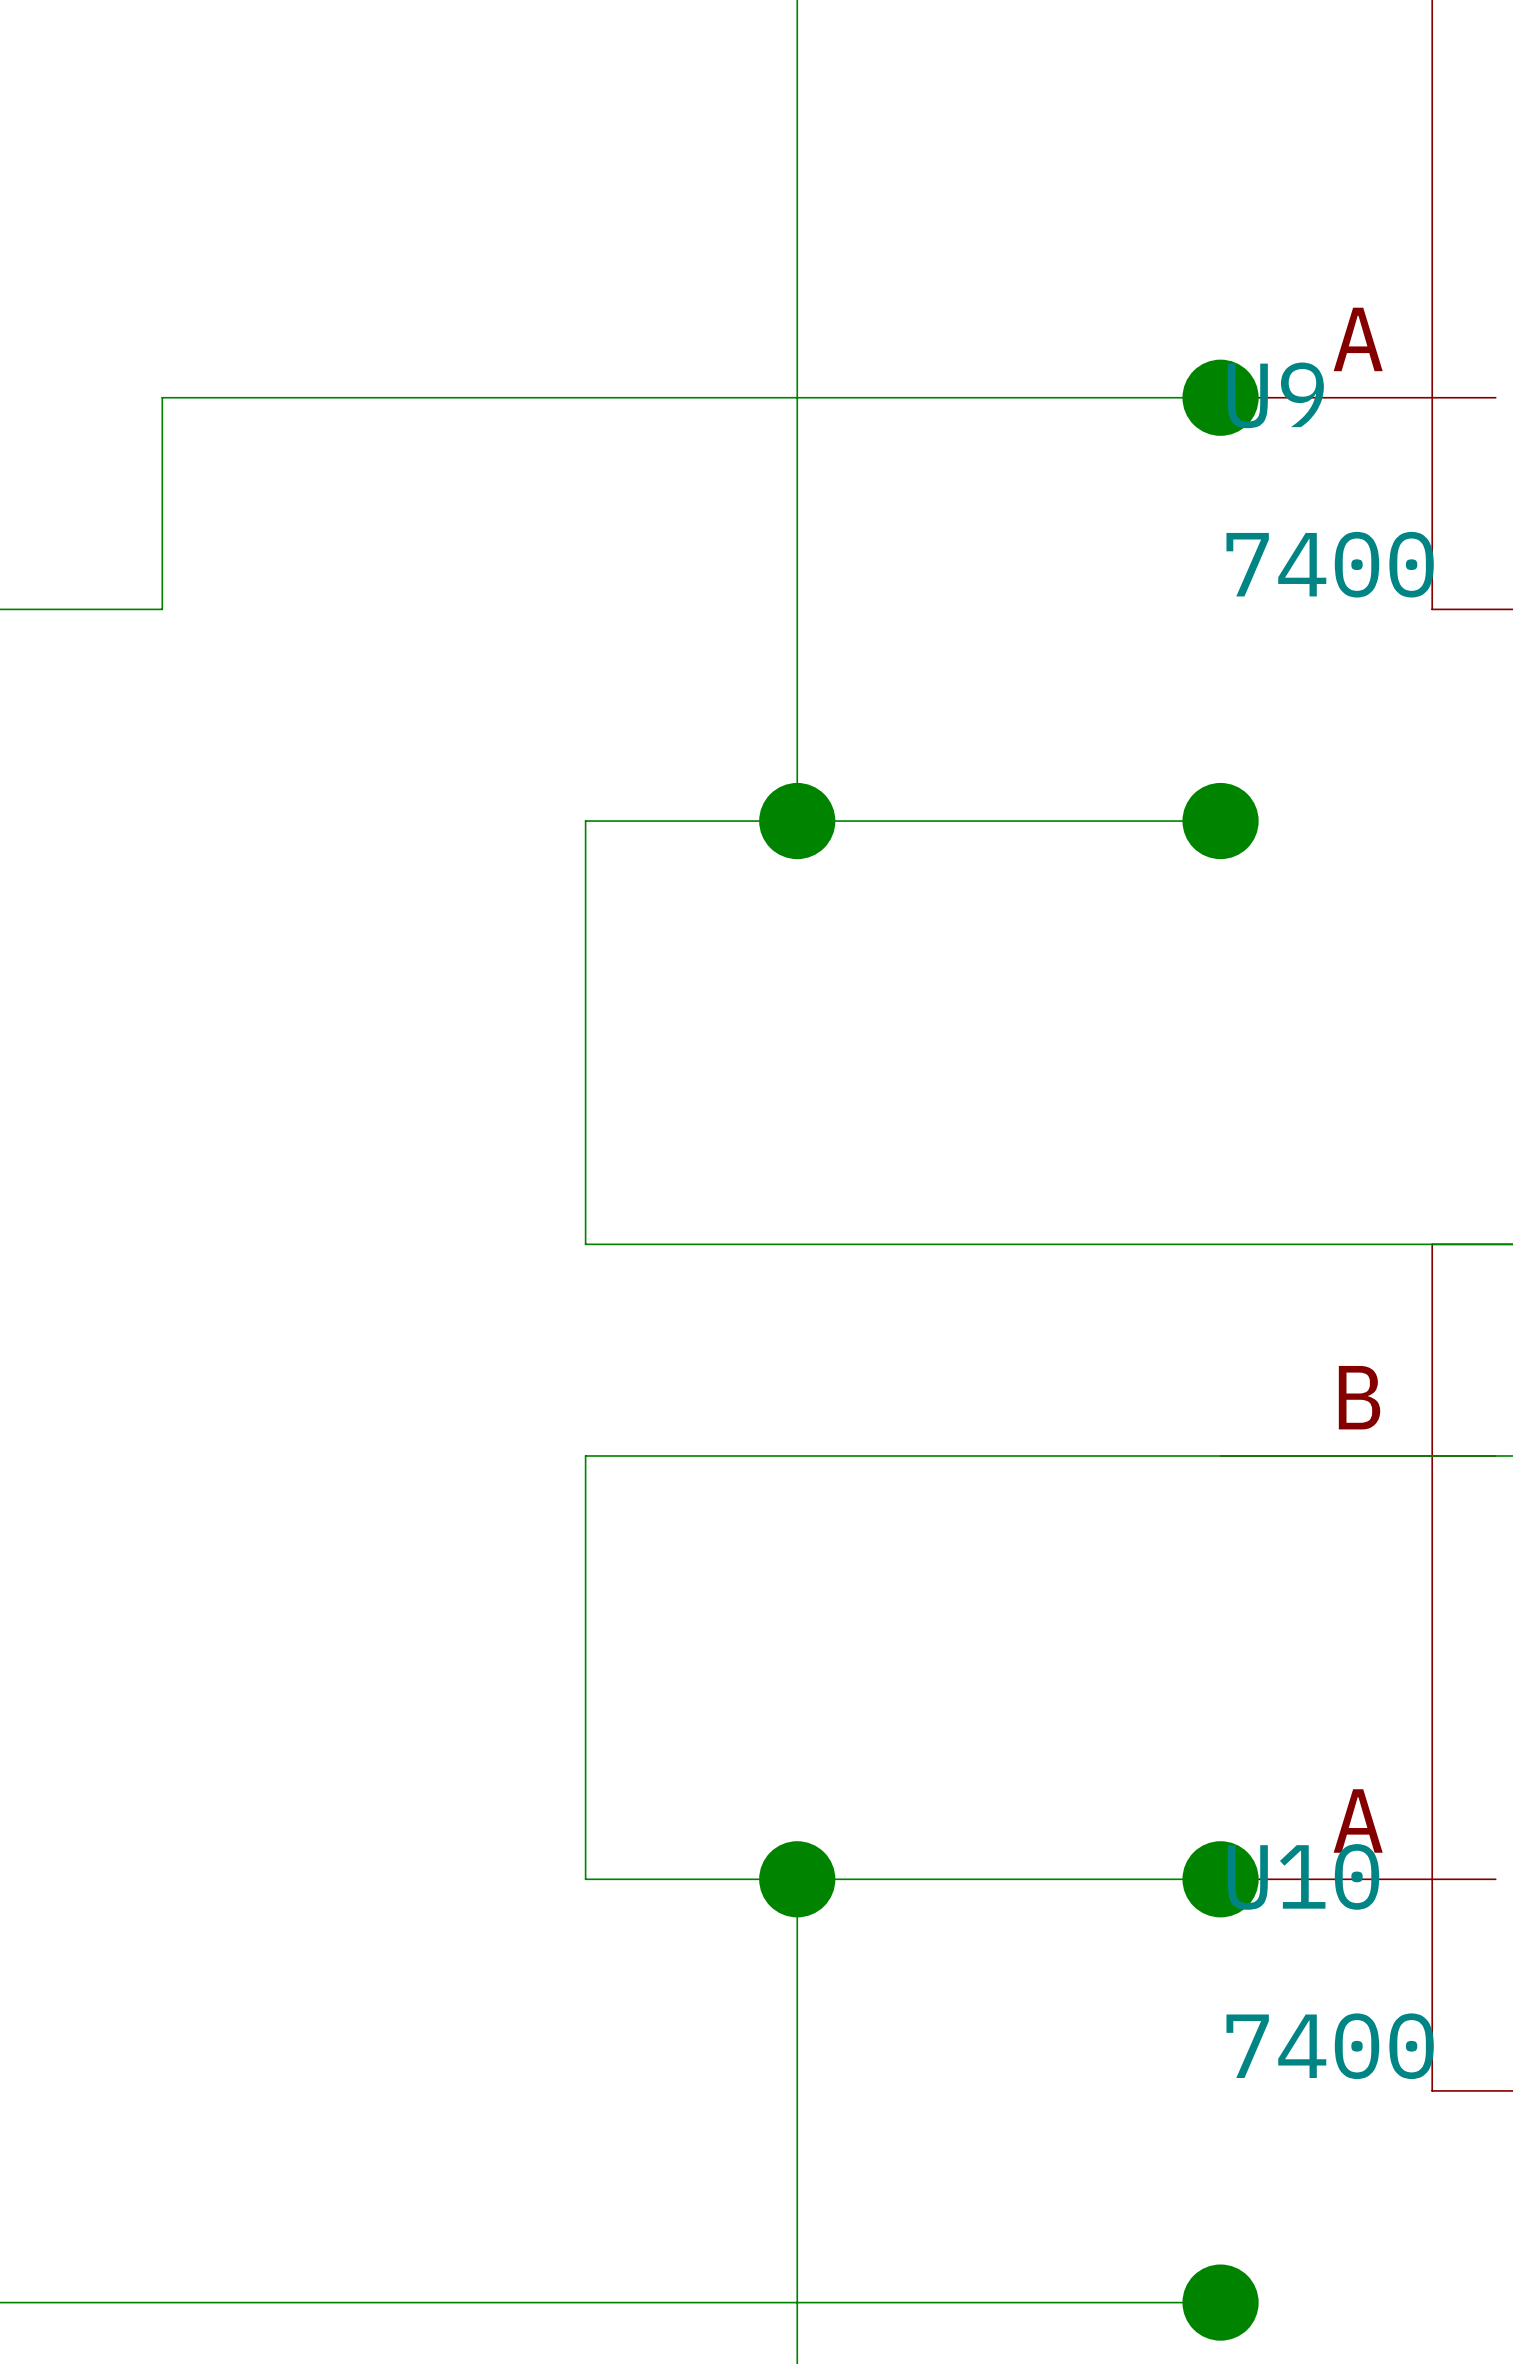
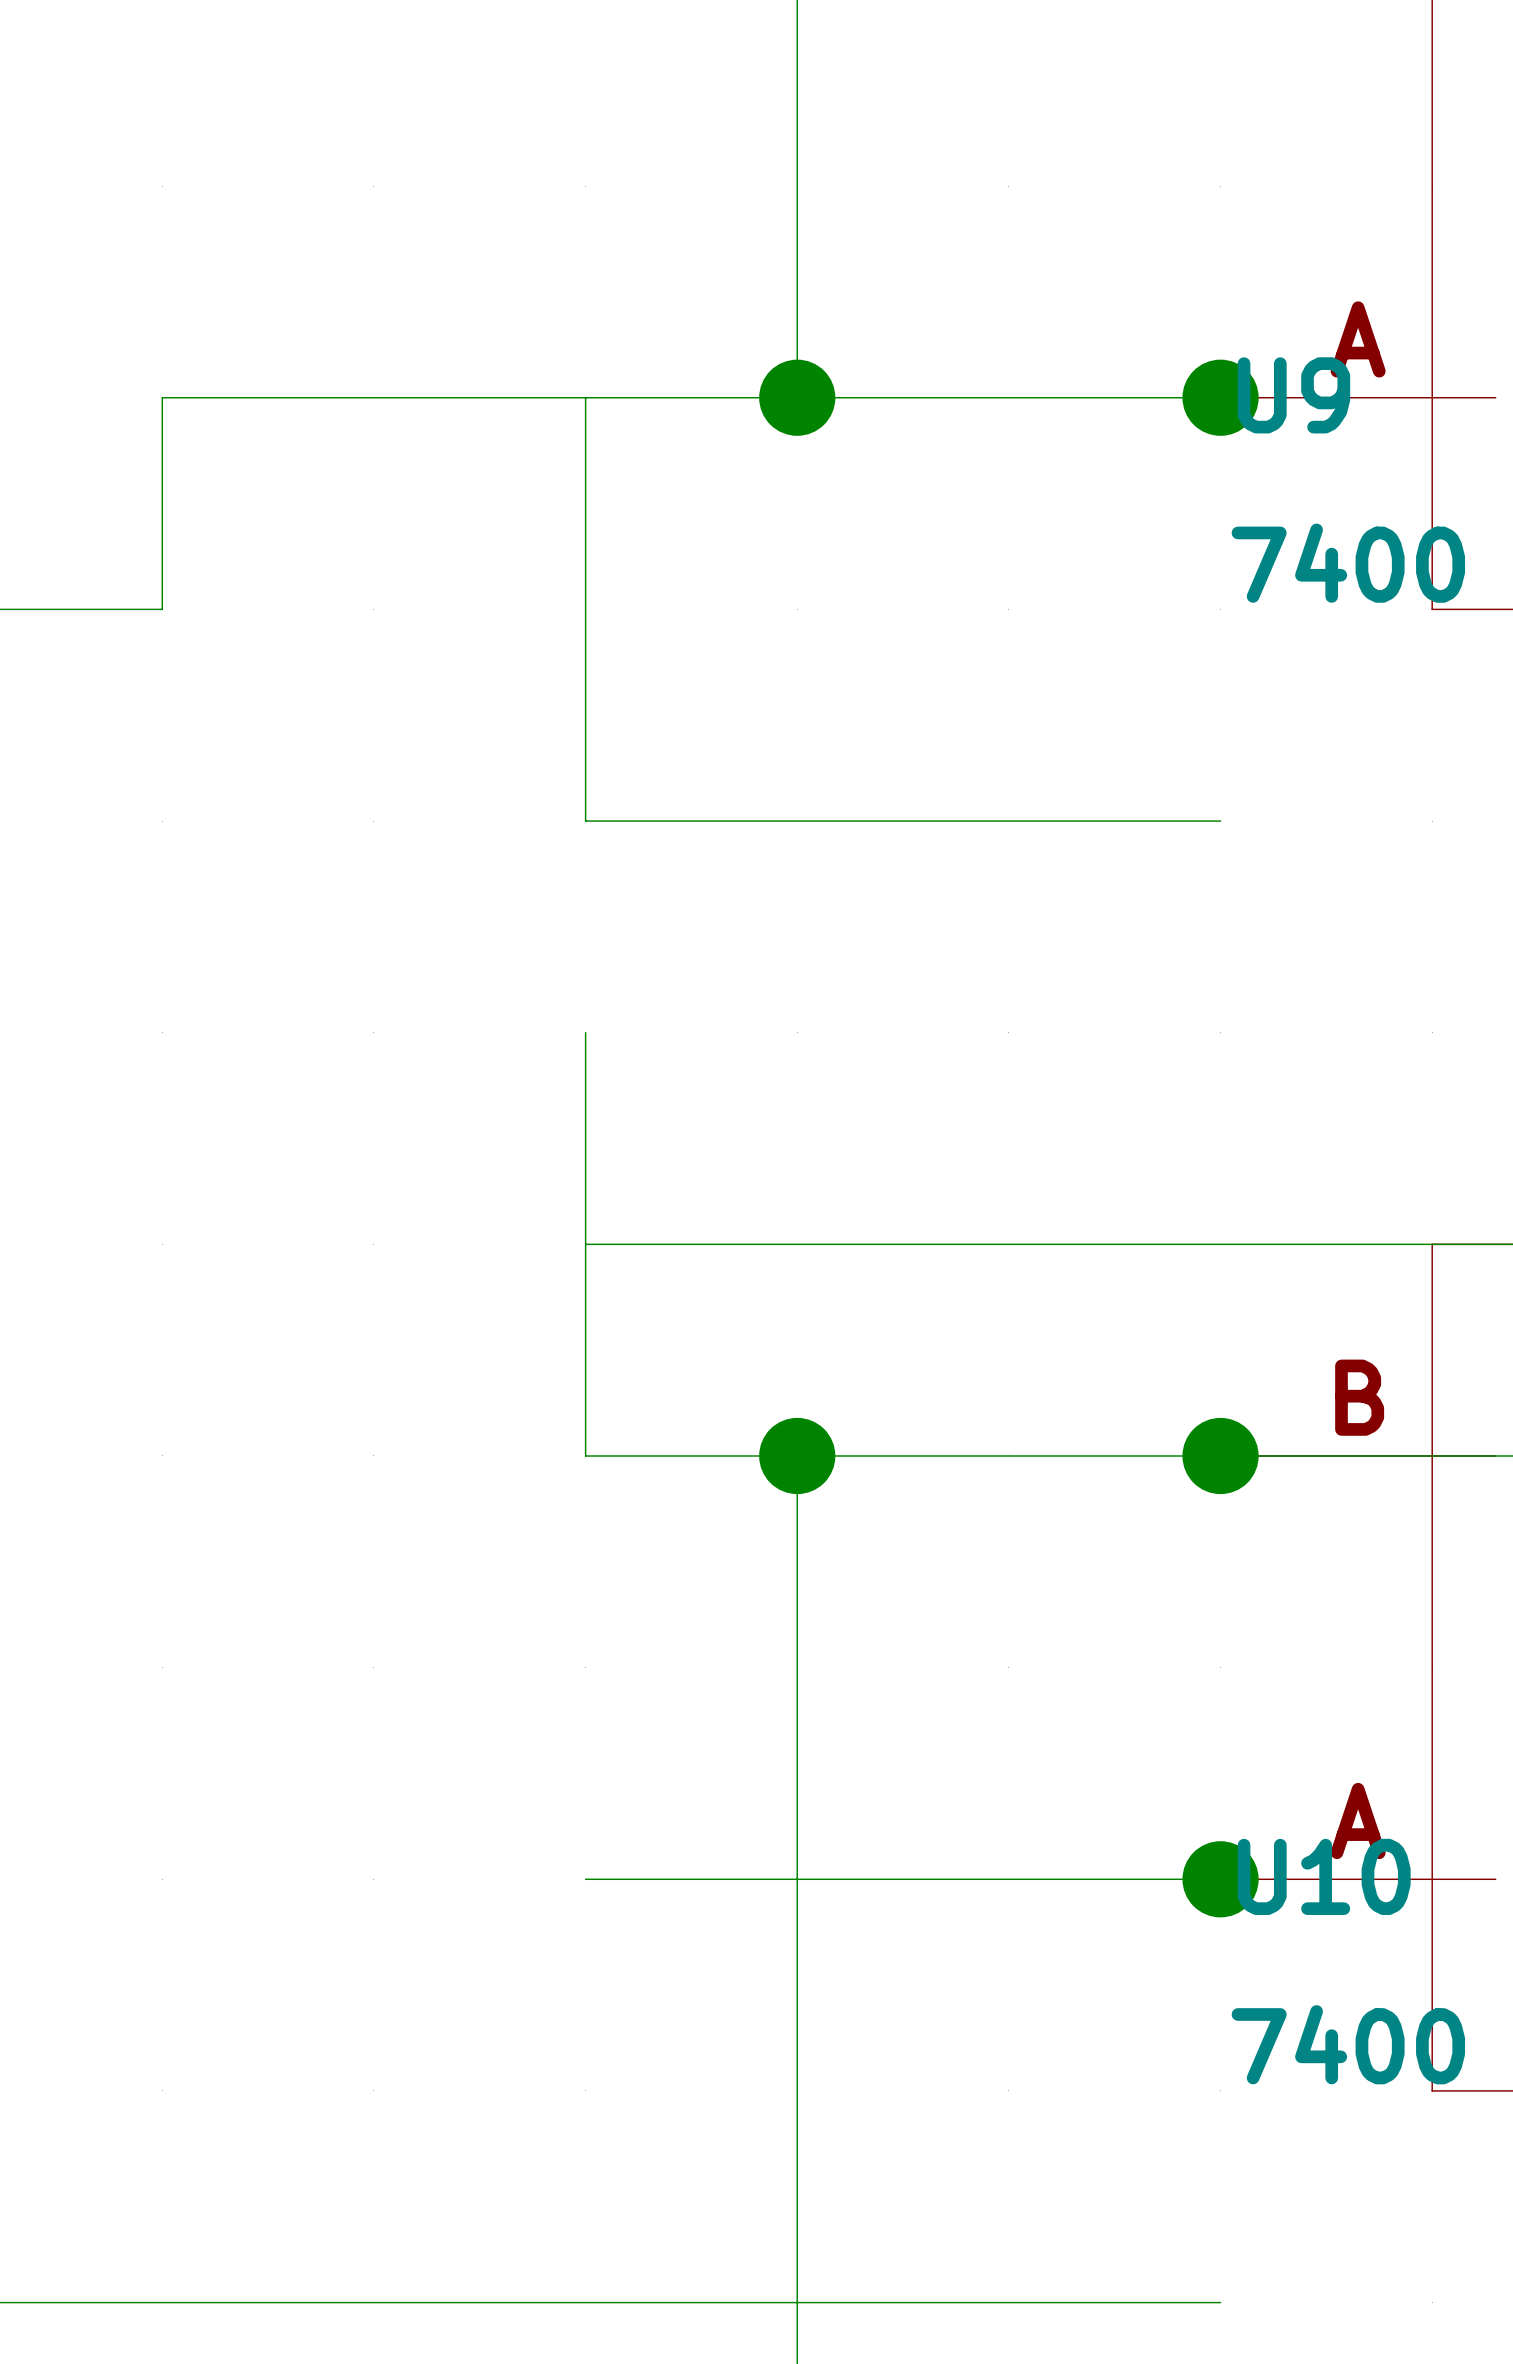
wire: (797, 397) (797, 821) -> (797, 1455) (797, 1879)
junction: none -> (797, 397)
wire: (585, 821) (585, 1032) -> (585, 821) (585, 397)
junction: (797, 821) -> none
junction: (1220, 821) -> none
wire: (585, 1455) (585, 1879) -> (585, 1455) (585, 1244)
junction: none -> (797, 1455)
junction: none -> (1220, 1455)
junction: (797, 1879) -> none
junction: (1220, 2302) -> none

